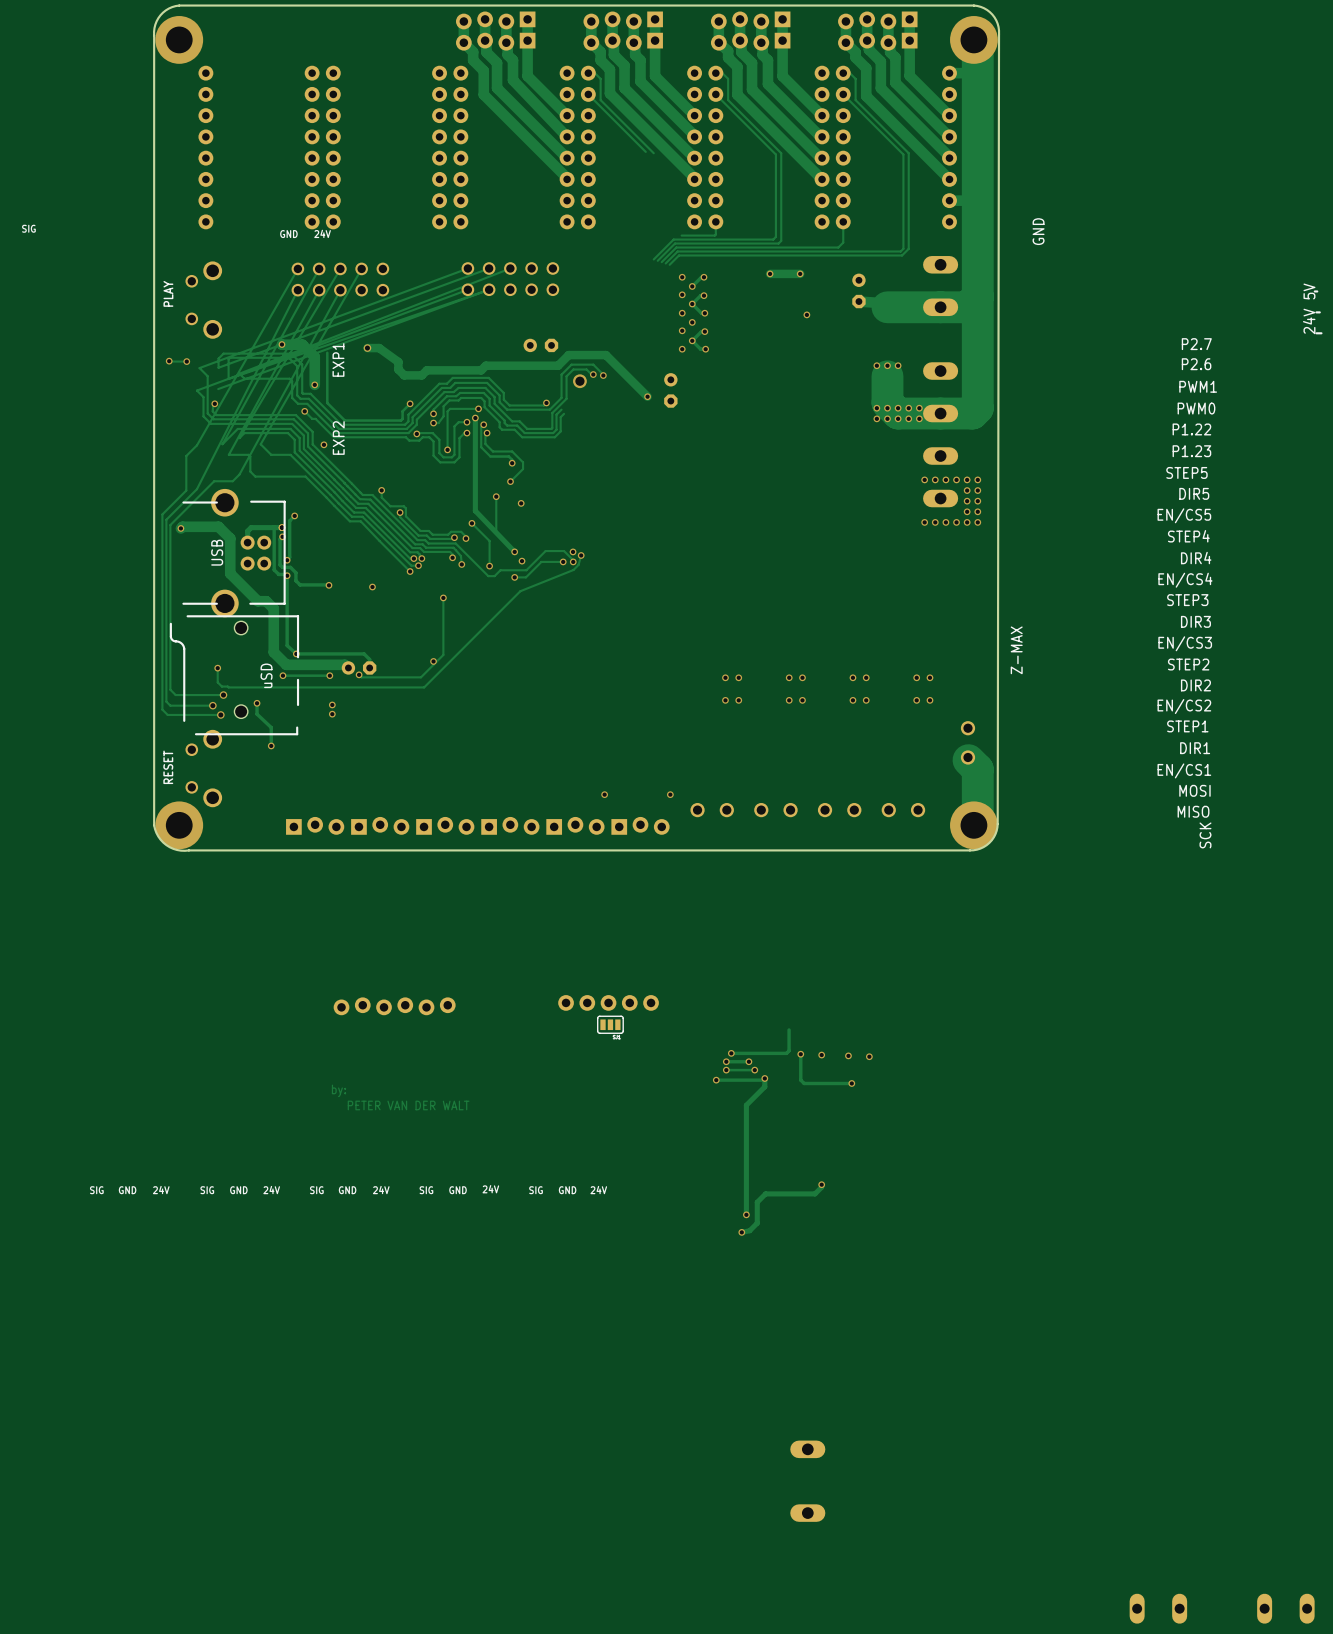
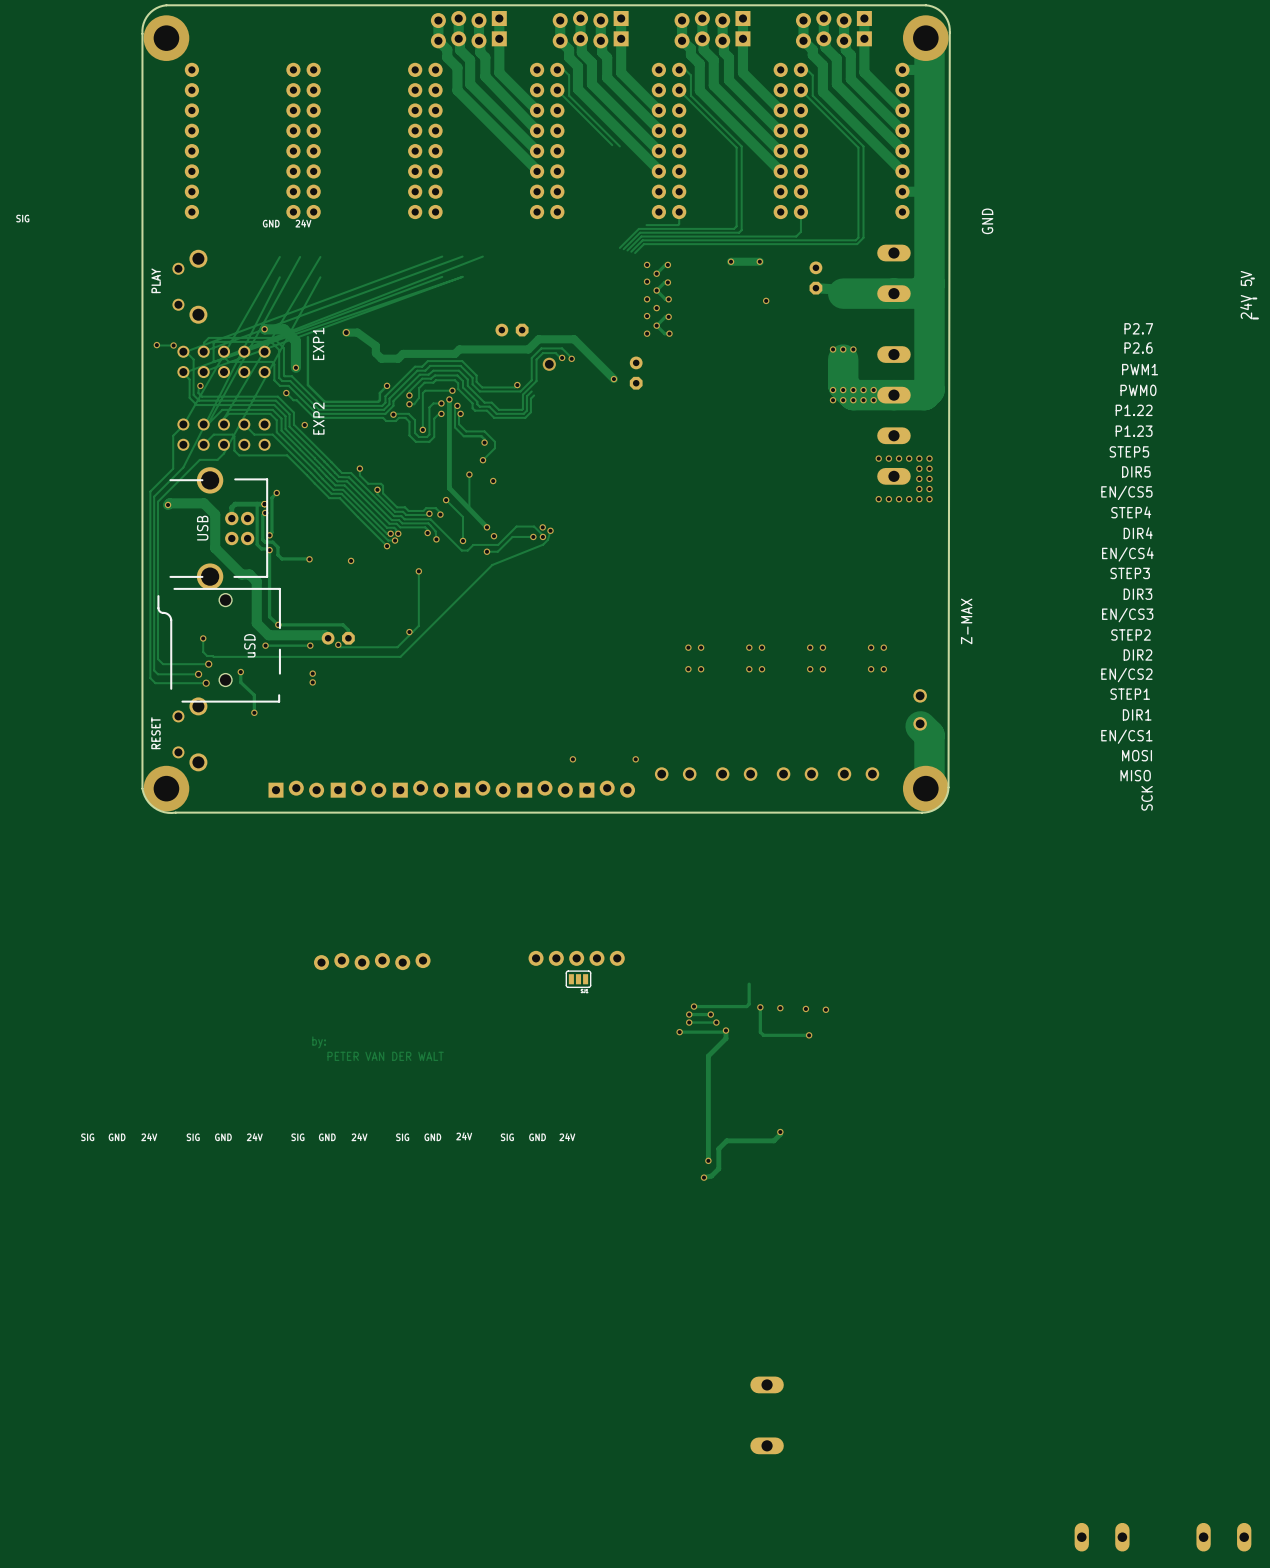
track: (361, 268) (260, 444) -> none
part: (340, 279) -> none
part: (510, 279) -> none
track: (319, 290) (228, 454) -> (203, 444) (213, 434)
part: none -> (223, 361)
part: none -> (223, 434)

